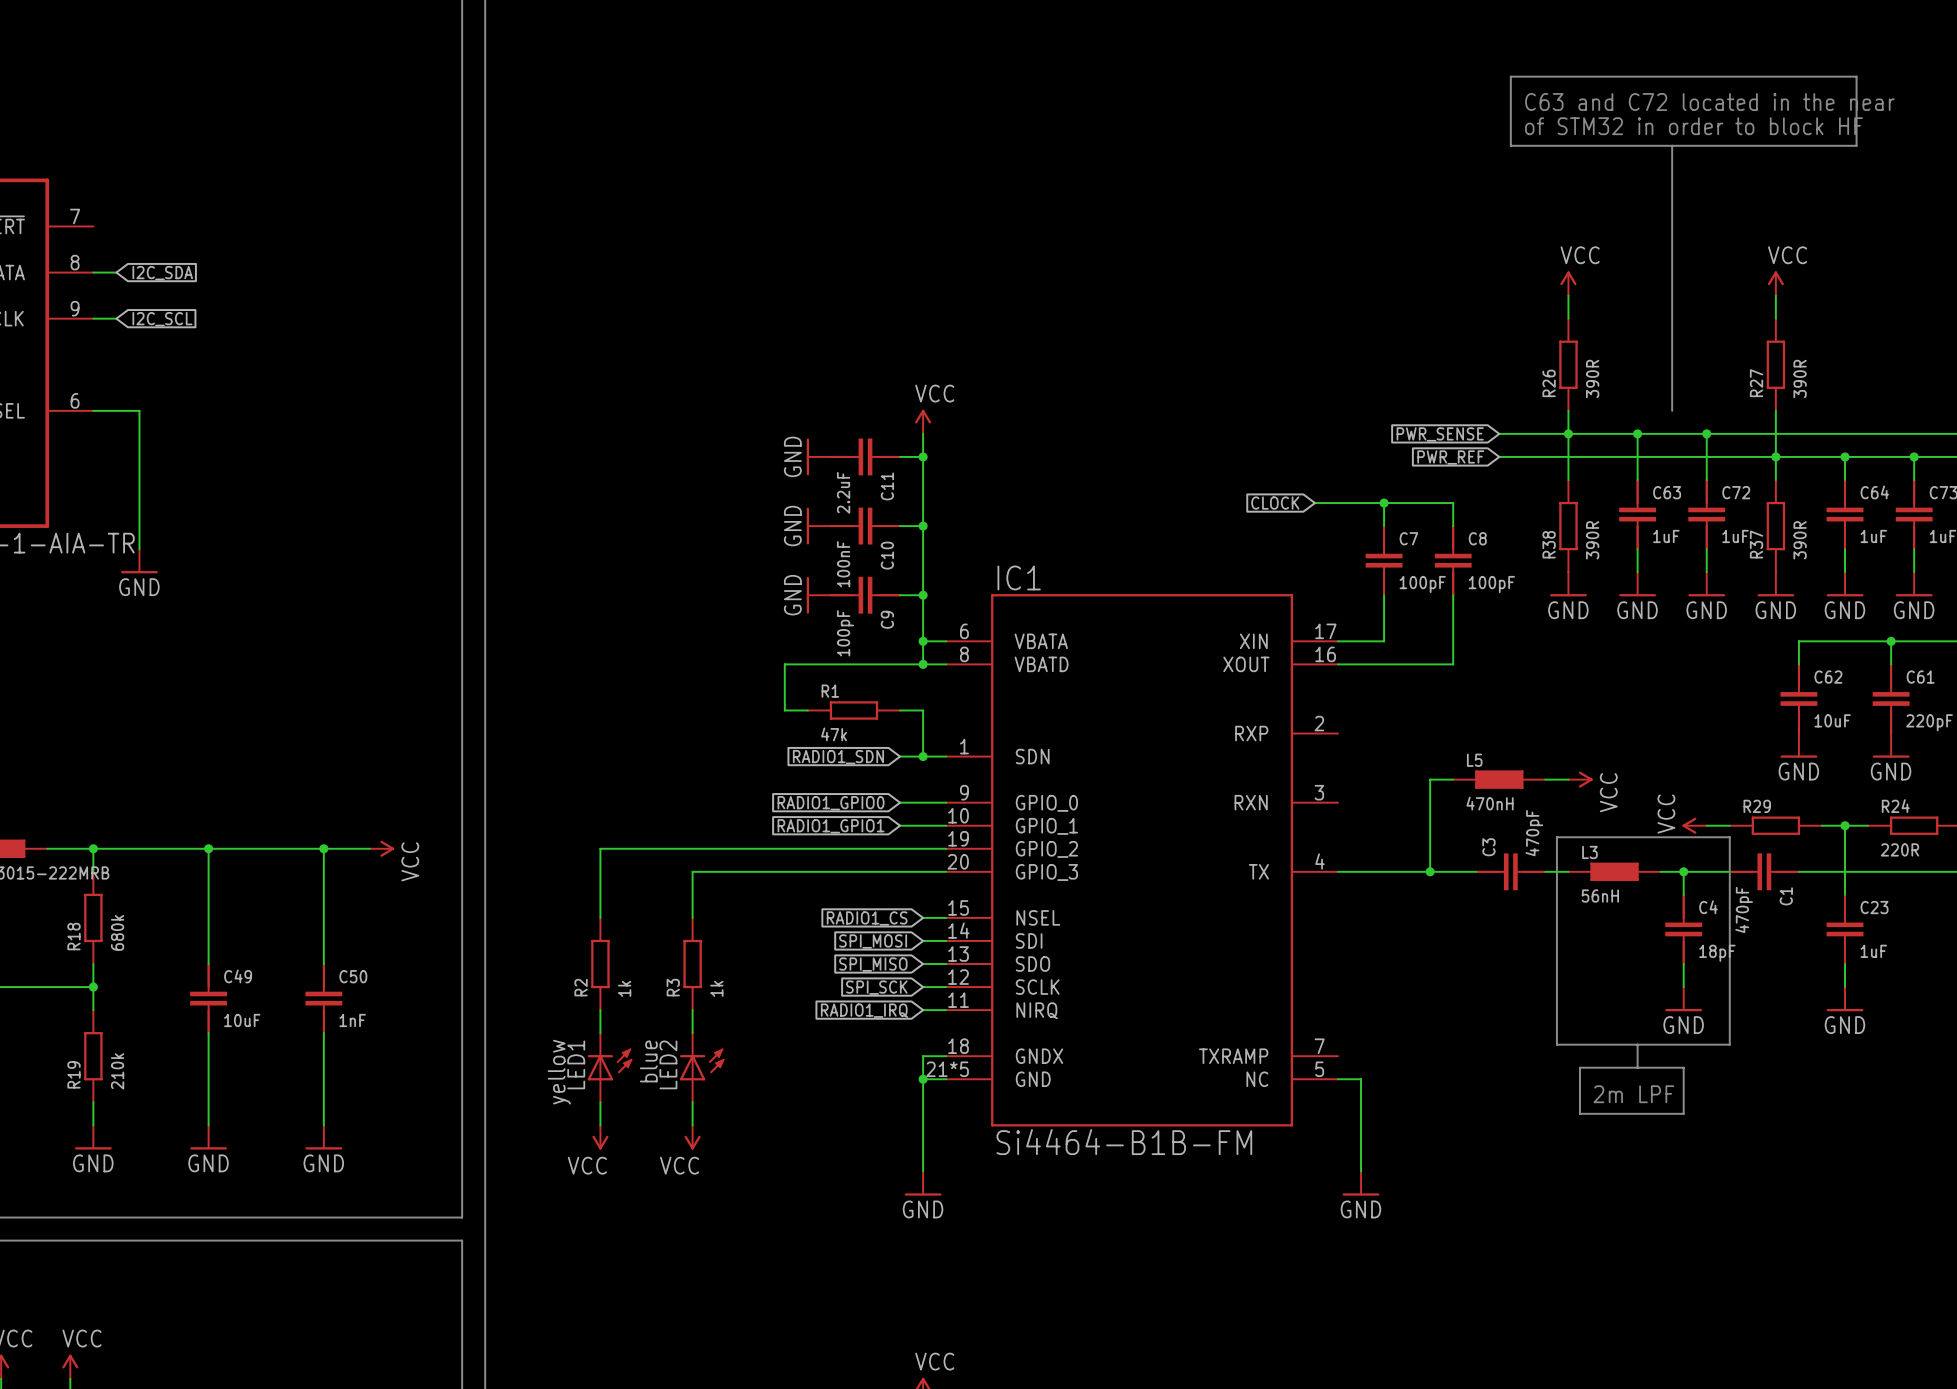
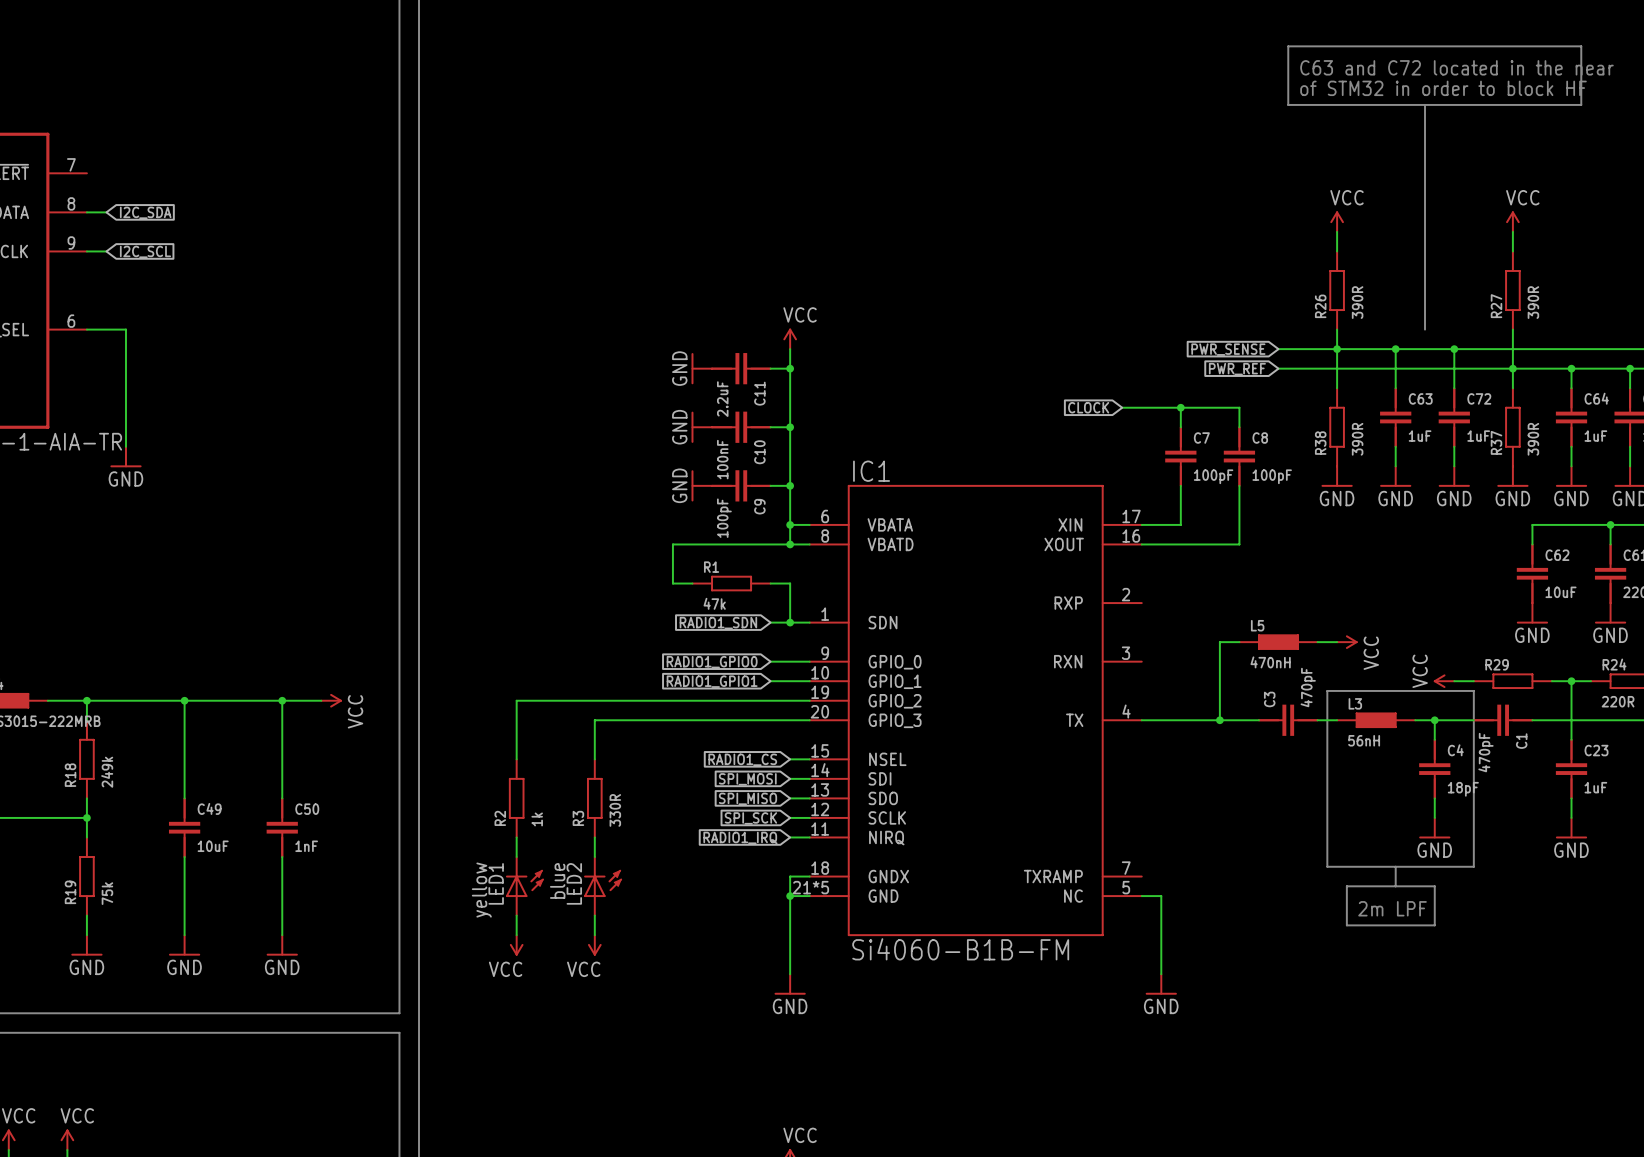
R18 value: 680k (117, 932) -> 249k (107, 772)
R3 value: 1k (716, 988) -> 330R (615, 810)
R19 value: 210k (117, 1071) -> 75k (107, 893)
IC1 value: Si4464-B1B-FM (1124, 1142) -> Si4060-B1B-FM (960, 949)

